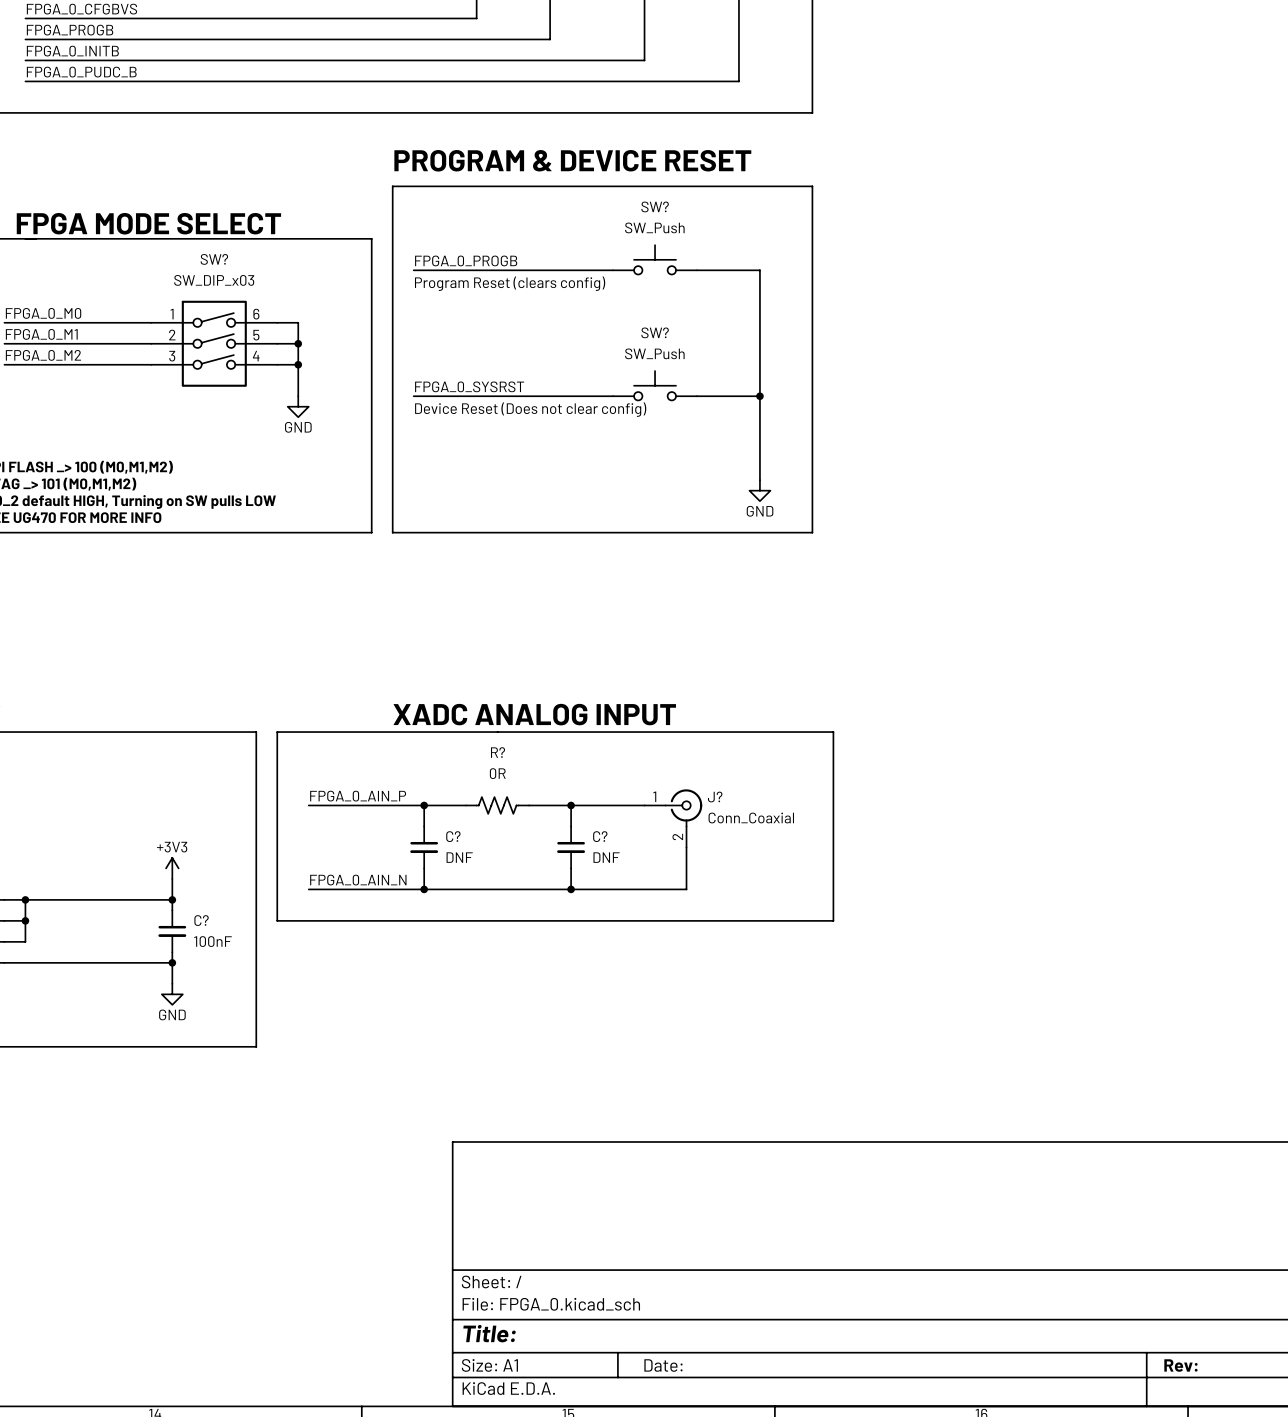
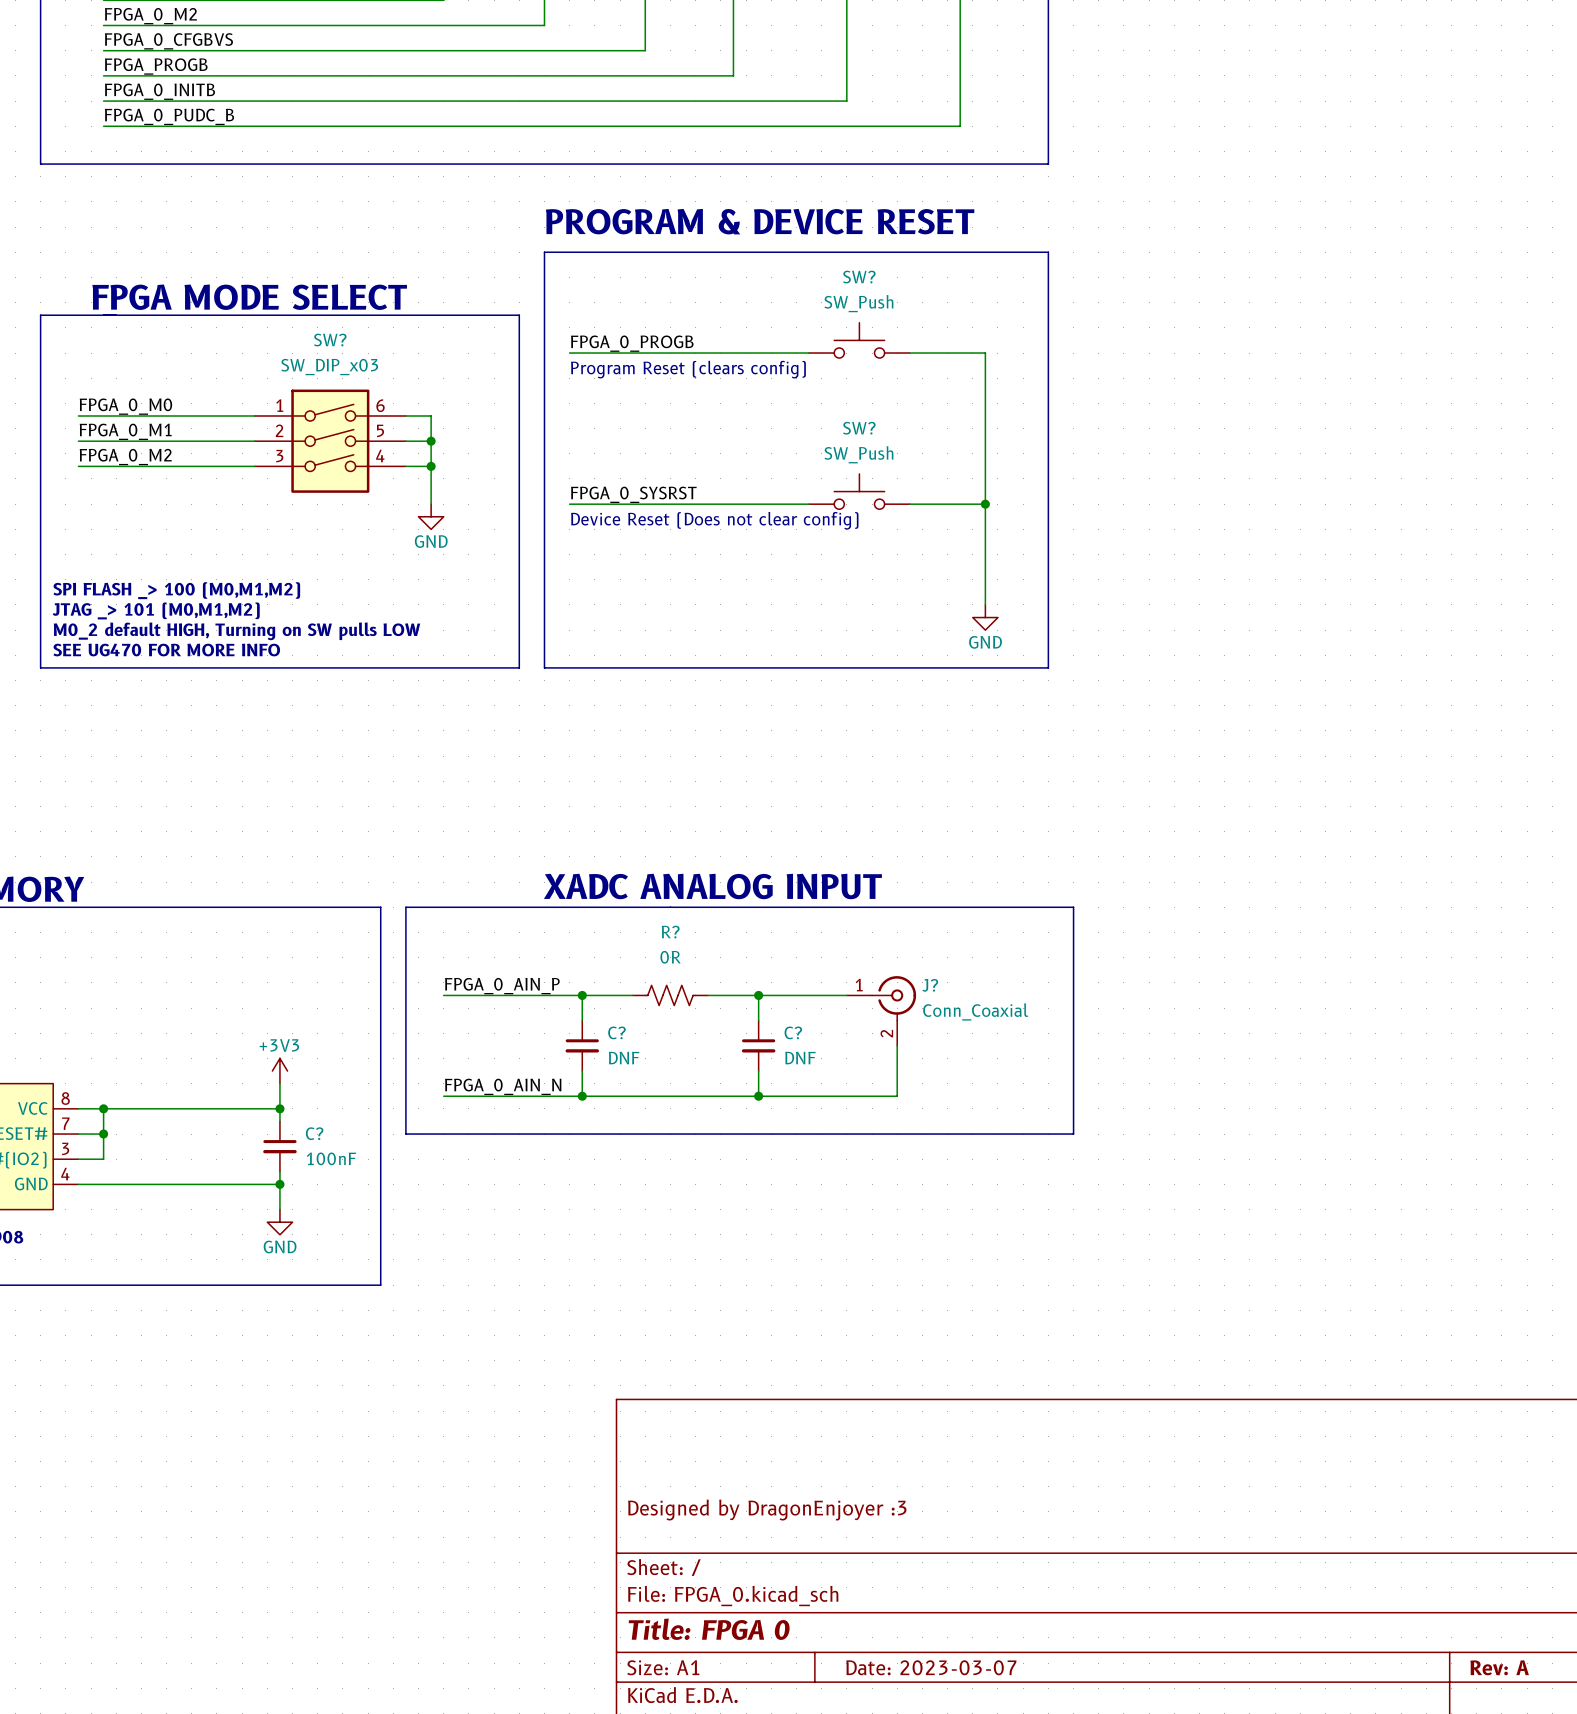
title block: none -> Designed by DragonEnjoyer :3 (767, 1510)
title block: Title: (489, 1333) -> Title: FPGA 0 (709, 1629)
title block: Date: (663, 1365) -> Date: 2023-03-07 (931, 1667)
title block: Rev: (1180, 1365) -> Rev: A (1499, 1667)

